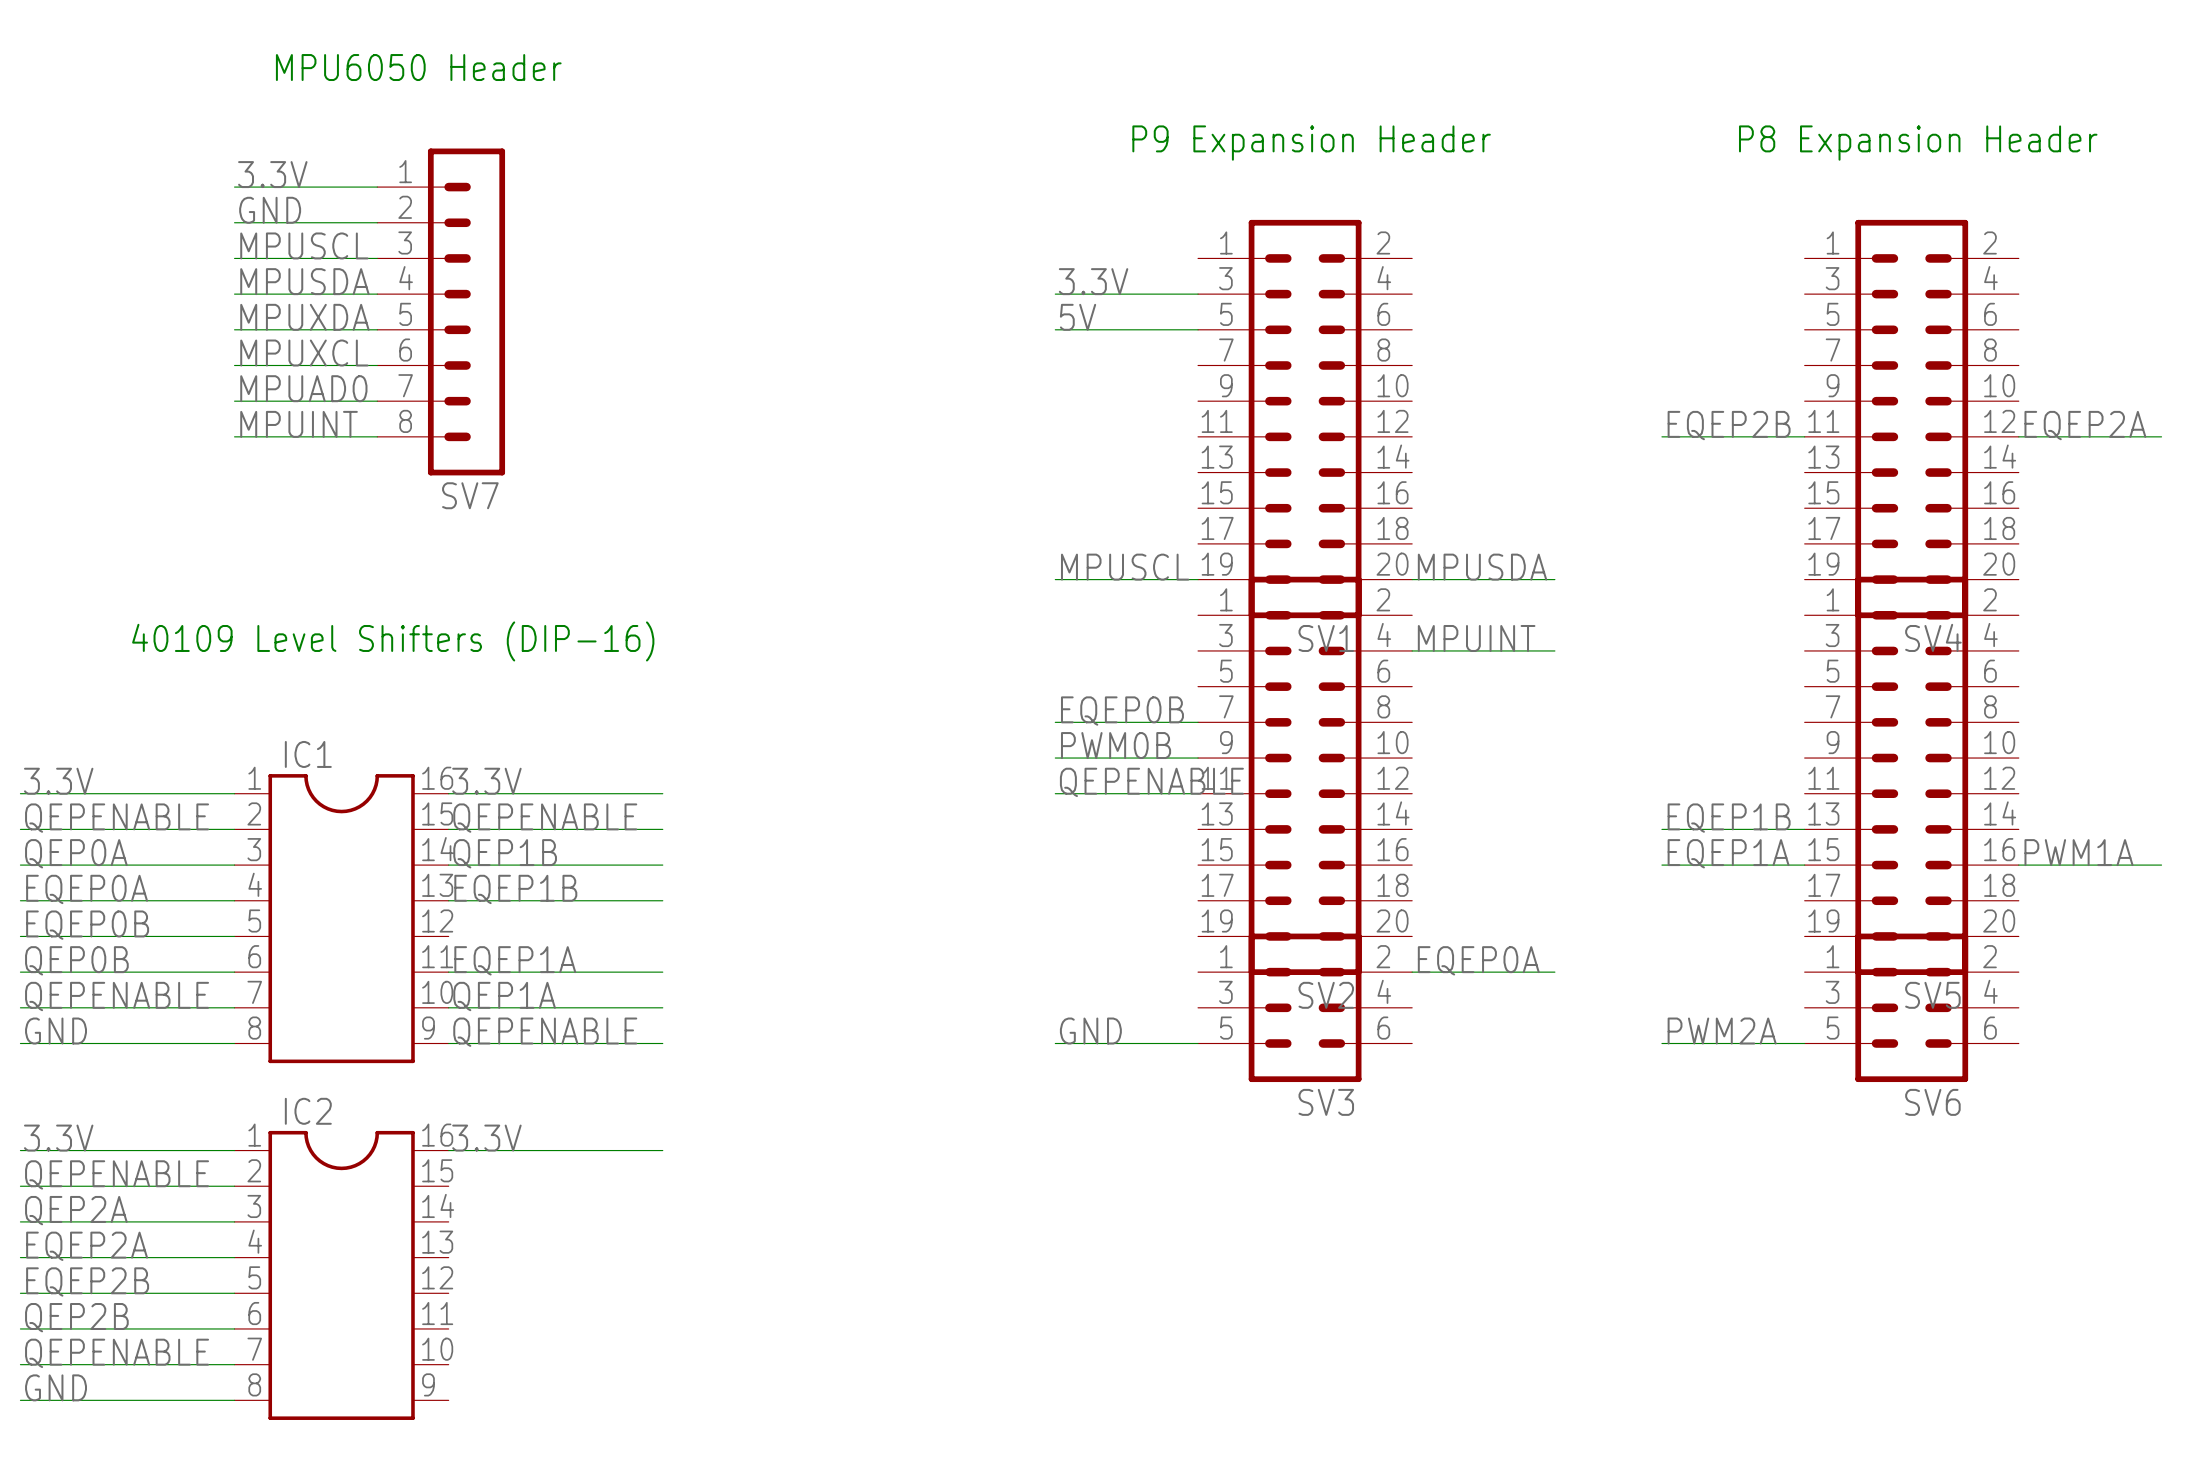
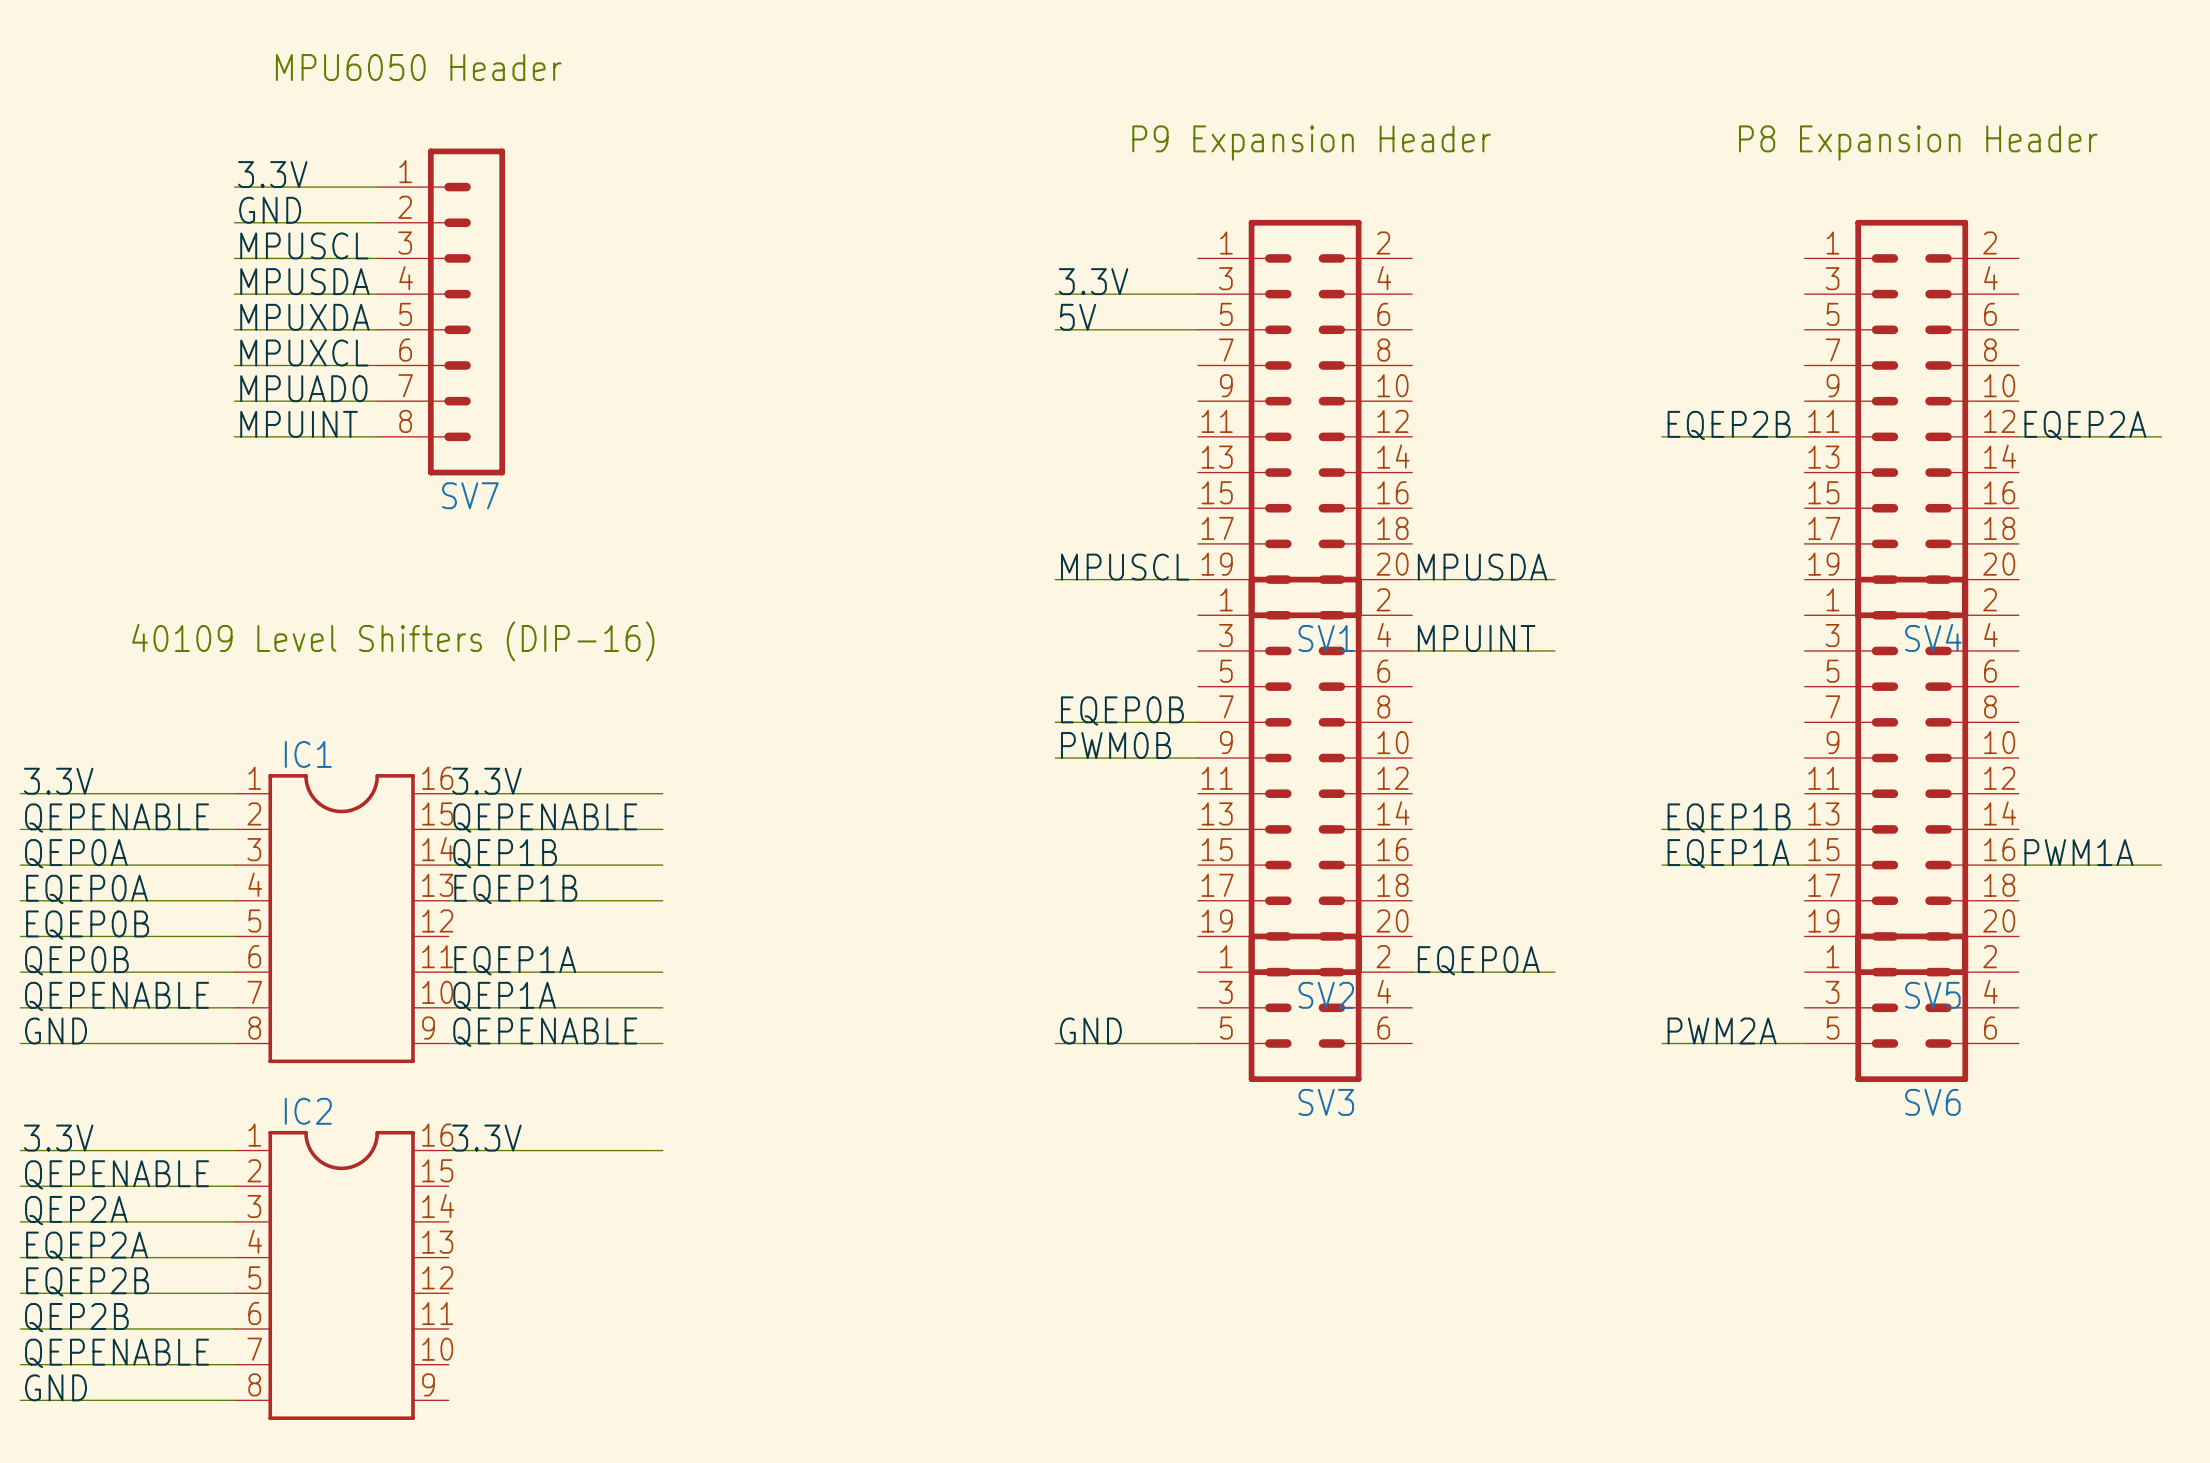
label: QEPENABLE (1151, 782) -> none
wire: (1055, 793) (1198, 793) -> none

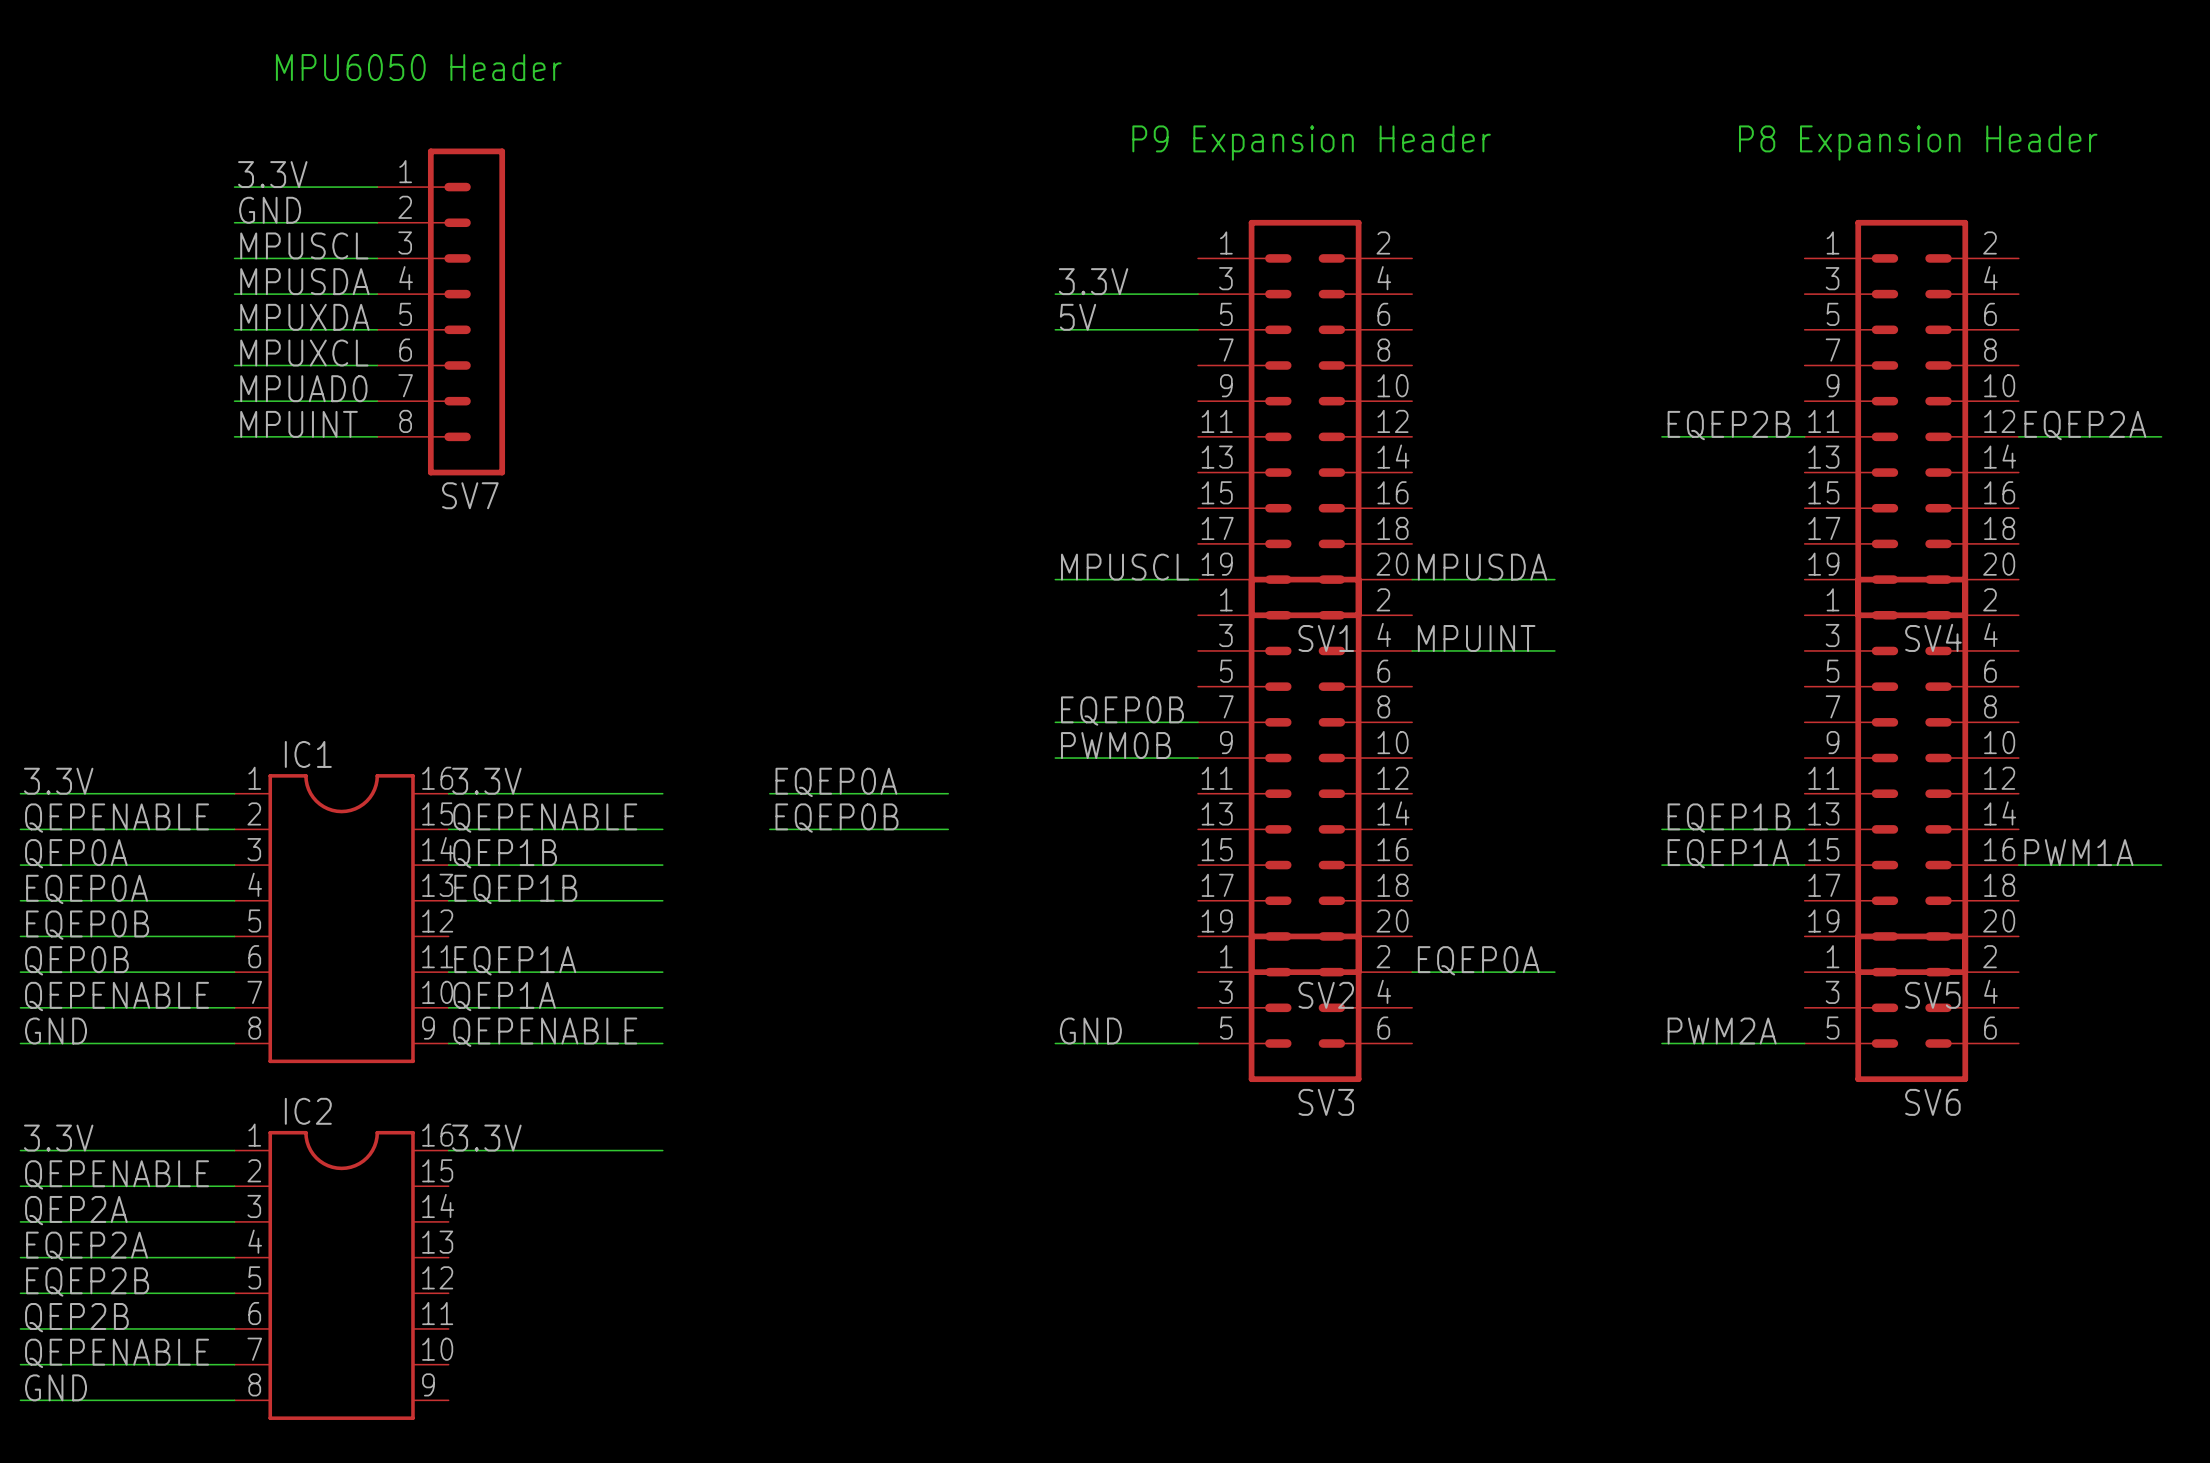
text: 40109 Level Shifters (DIP-16) (393, 641) -> none
label: none -> EQEP0A (836, 782)
wire: none -> (769, 793) (948, 793)
label: none -> EQEP0B (836, 818)
wire: none -> (769, 829) (948, 829)

